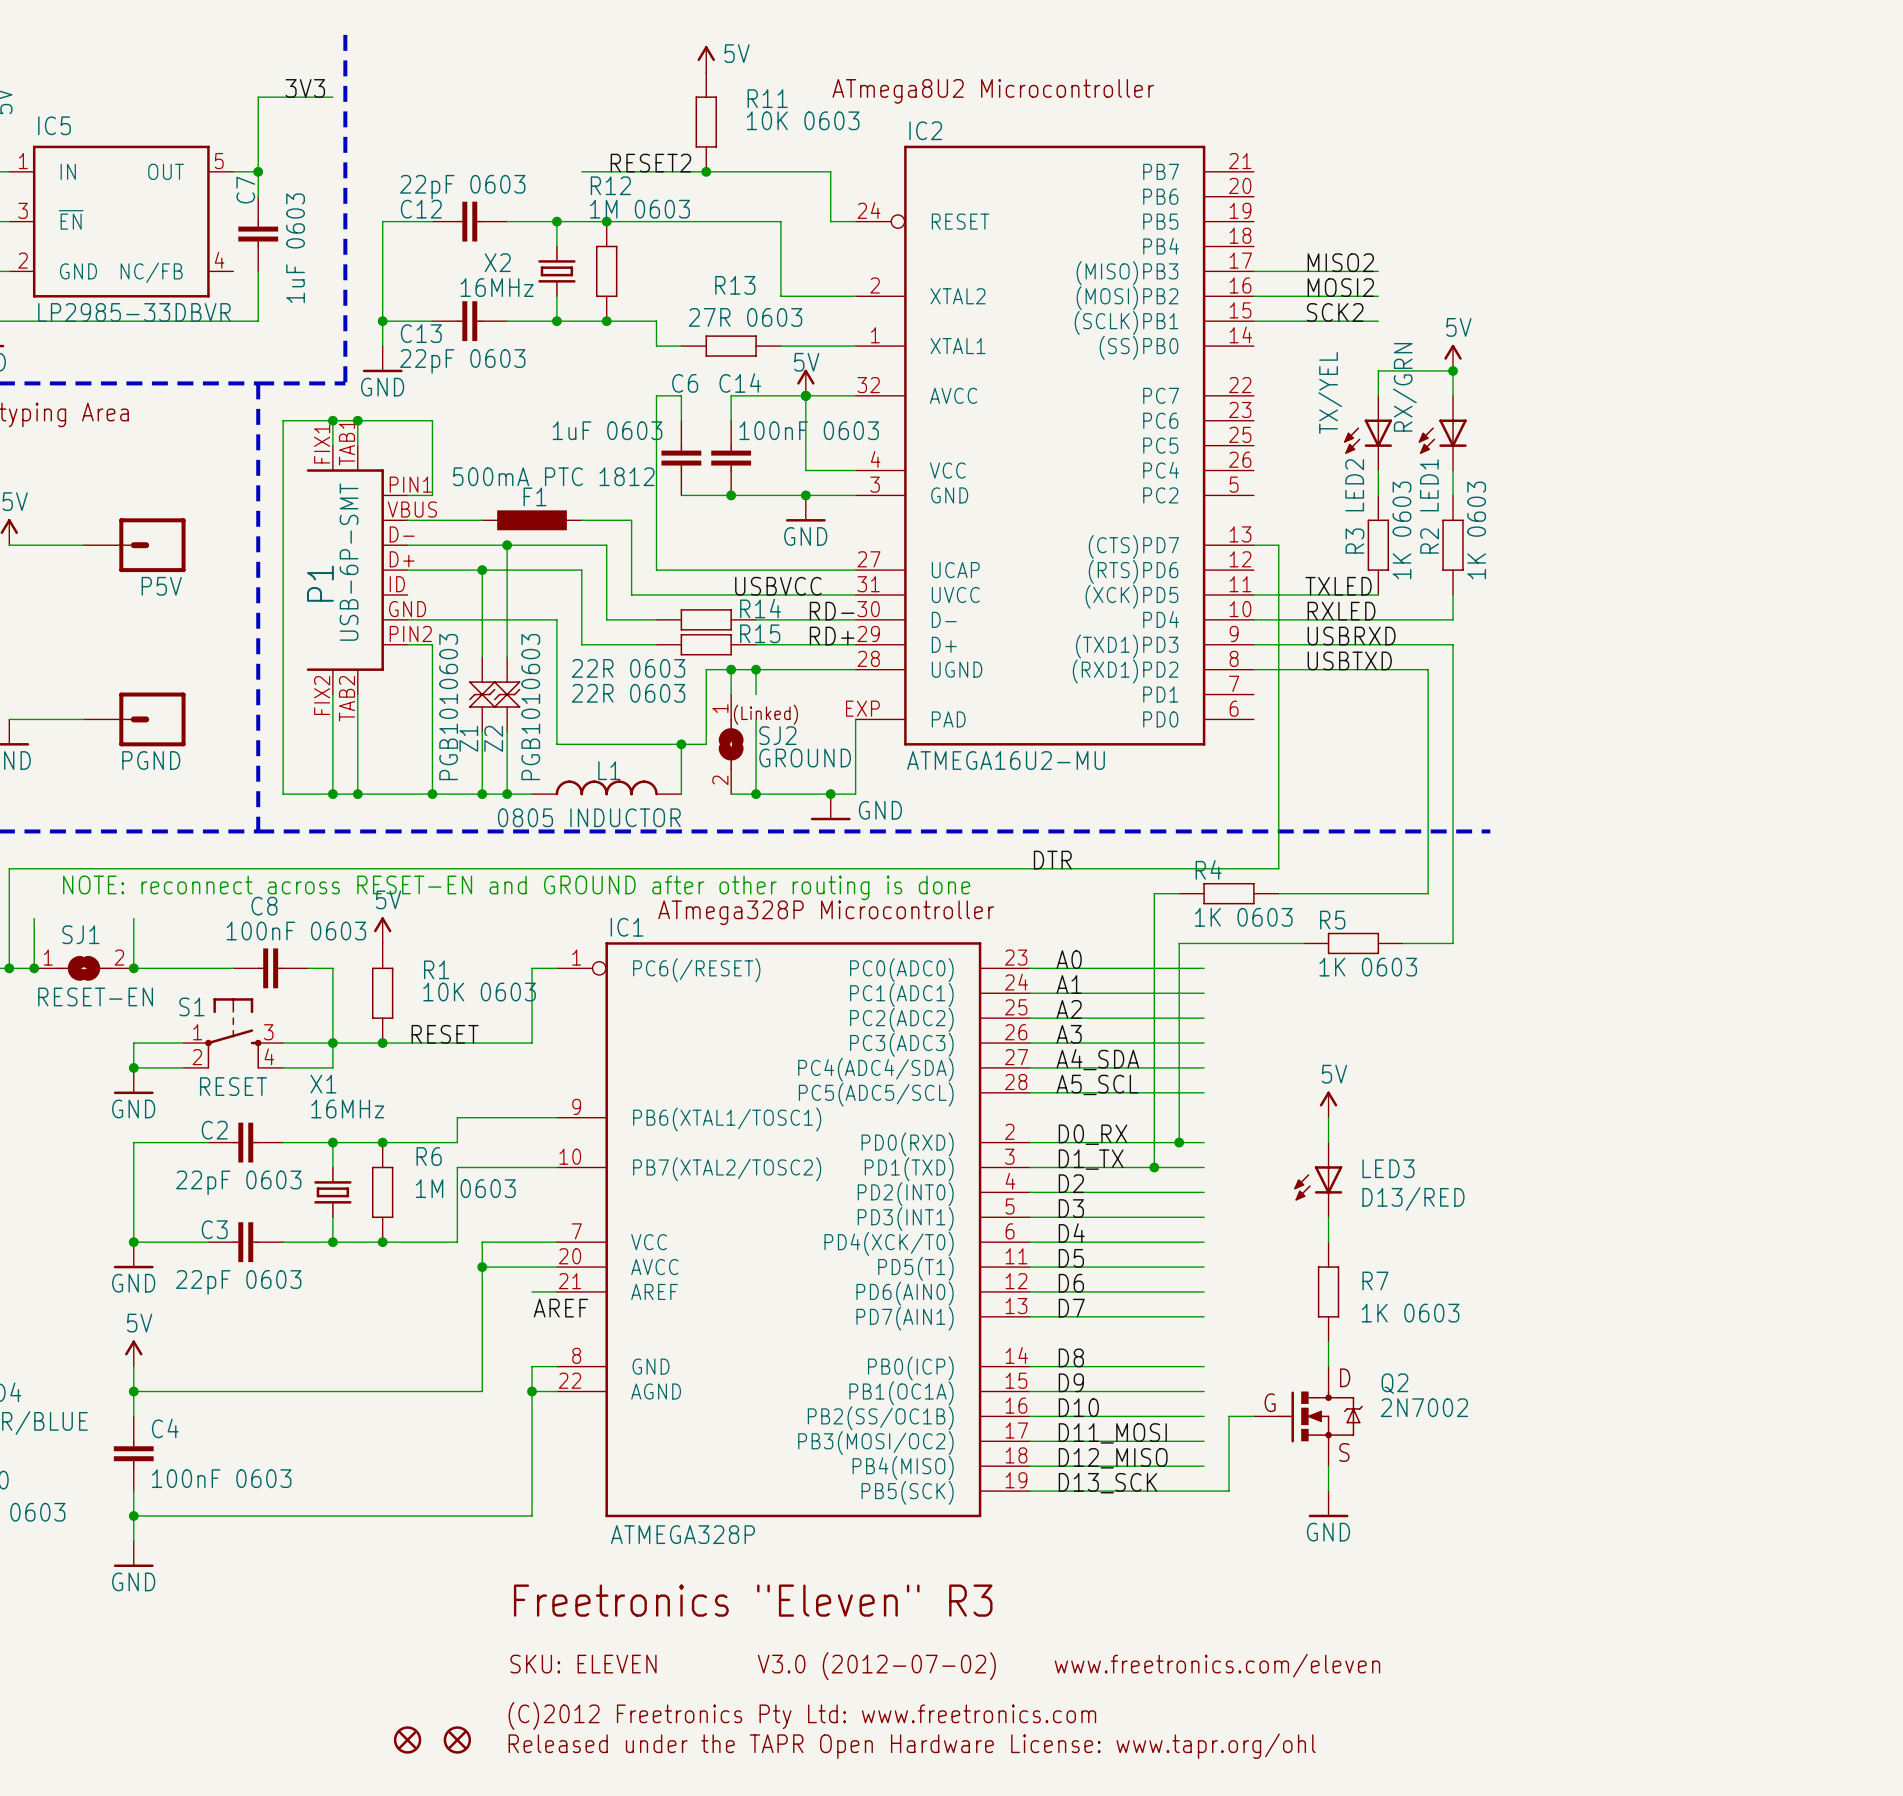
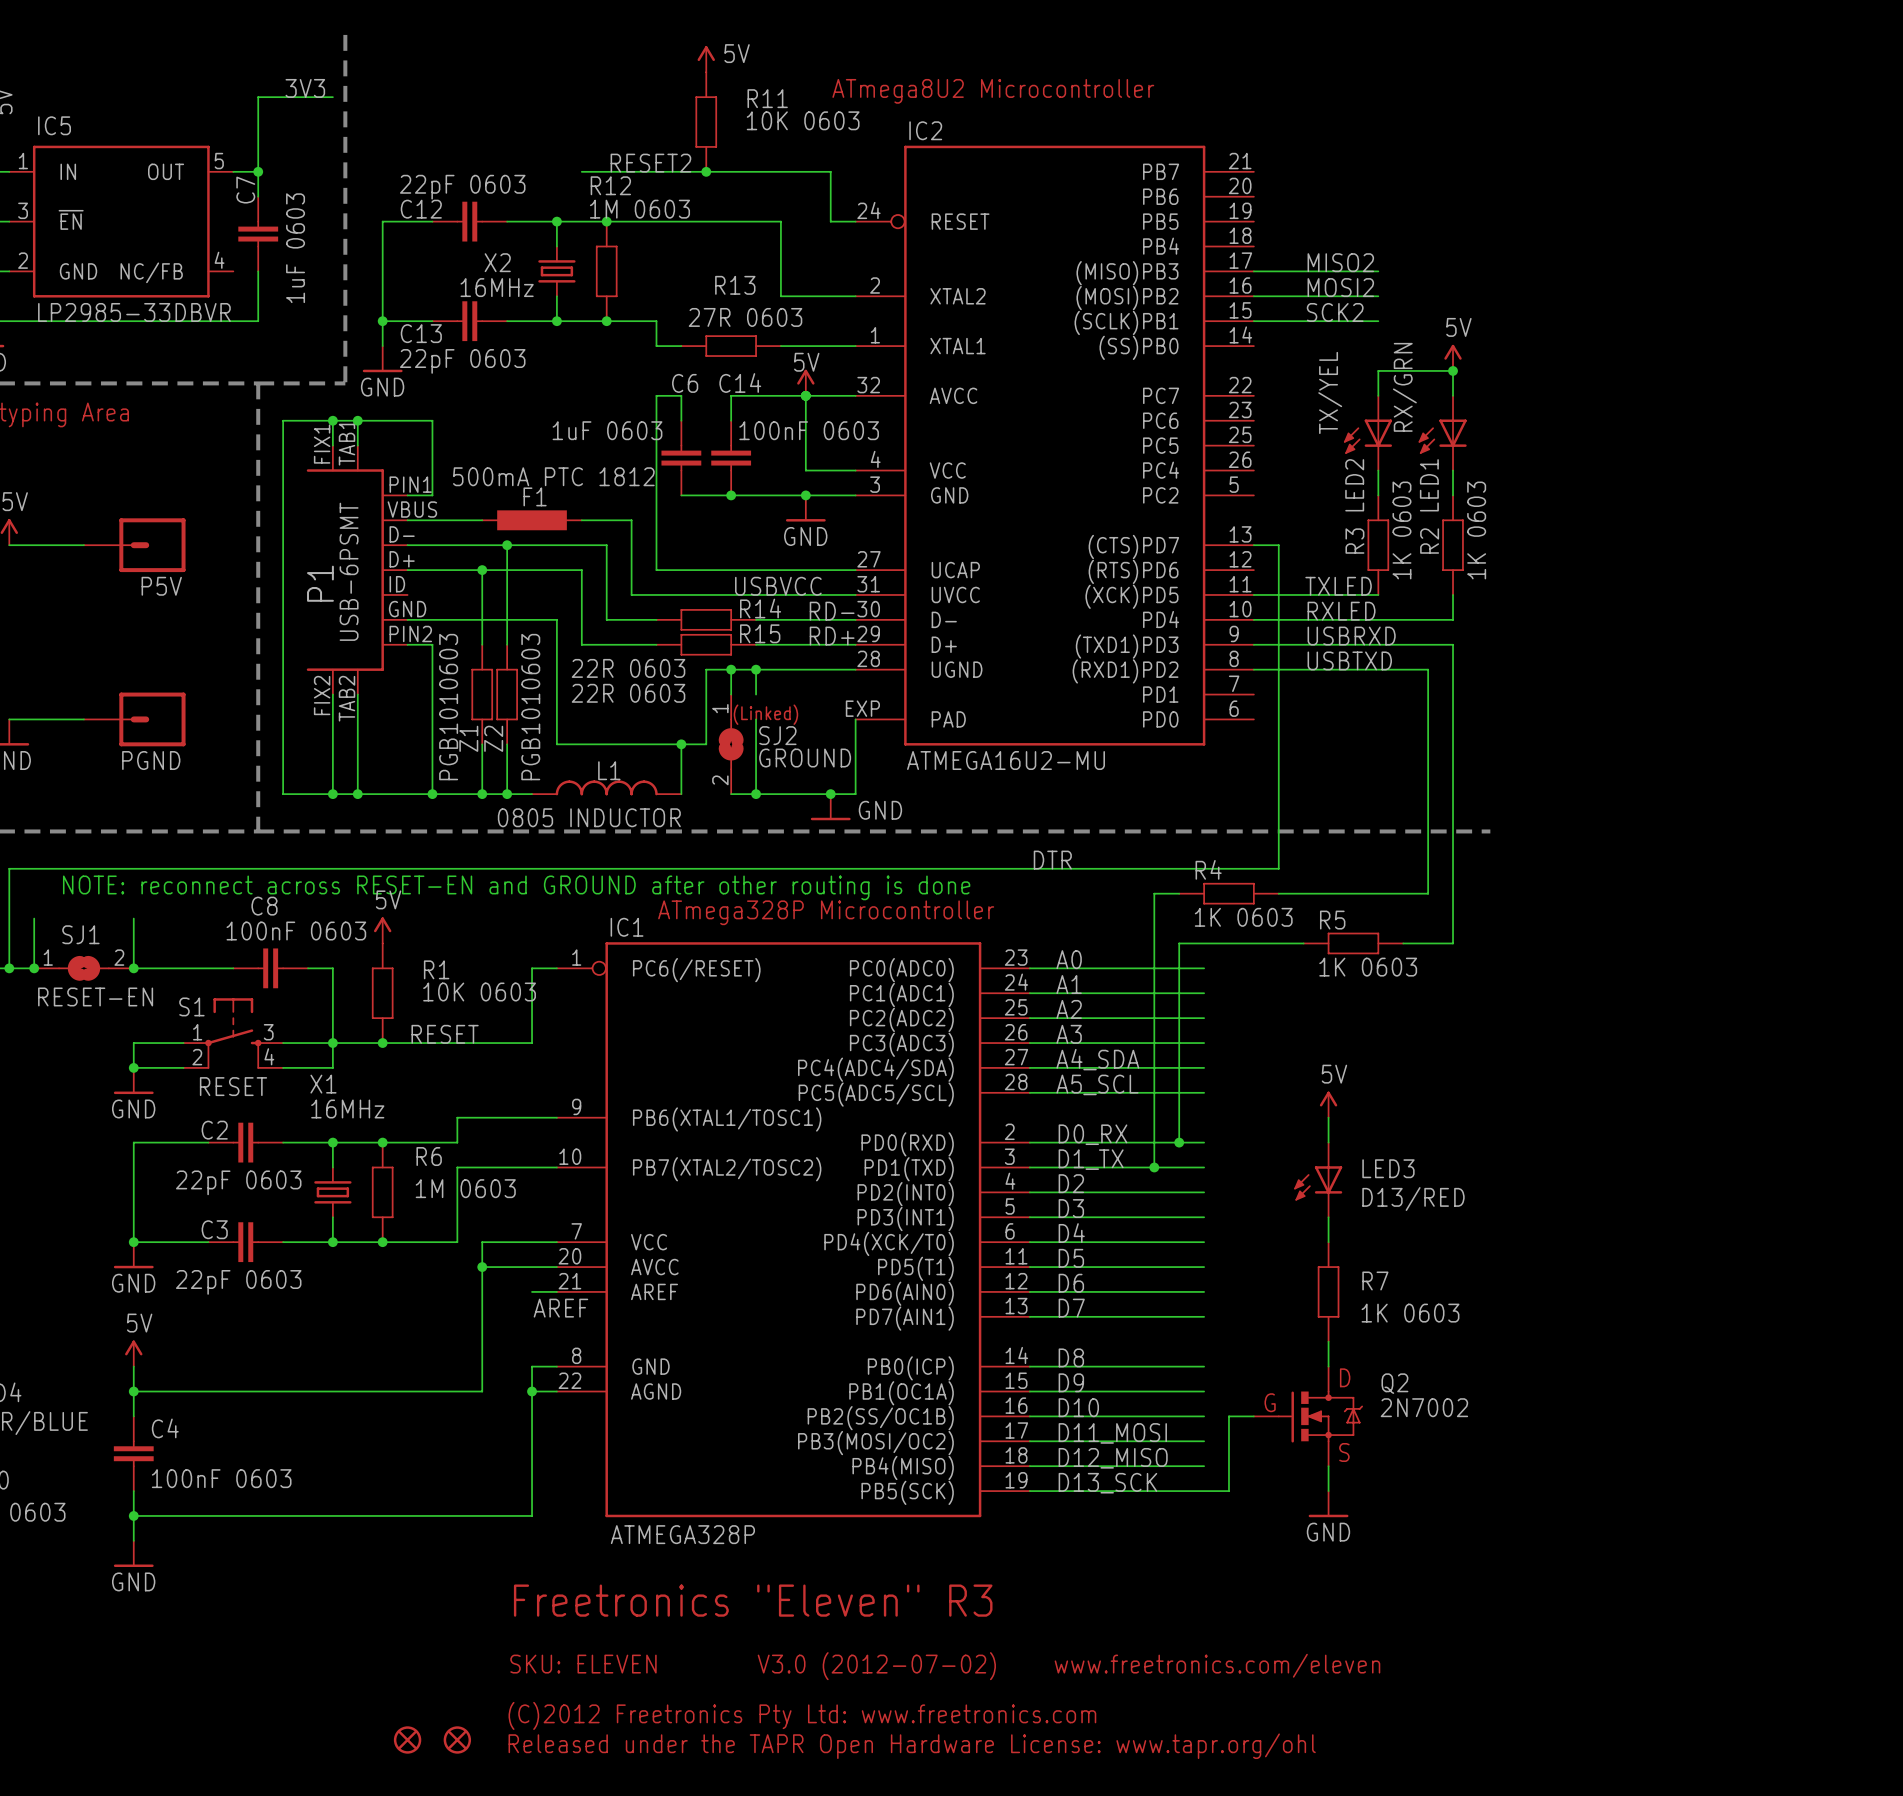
P1 value: USB-6P-SMT (349, 562) -> USB-6PSMT (349, 571)
Z1 symbol: [469, 657, 496, 732] -> [471, 644, 493, 745]
Z2 symbol: [493, 657, 521, 732] -> [496, 644, 518, 745]

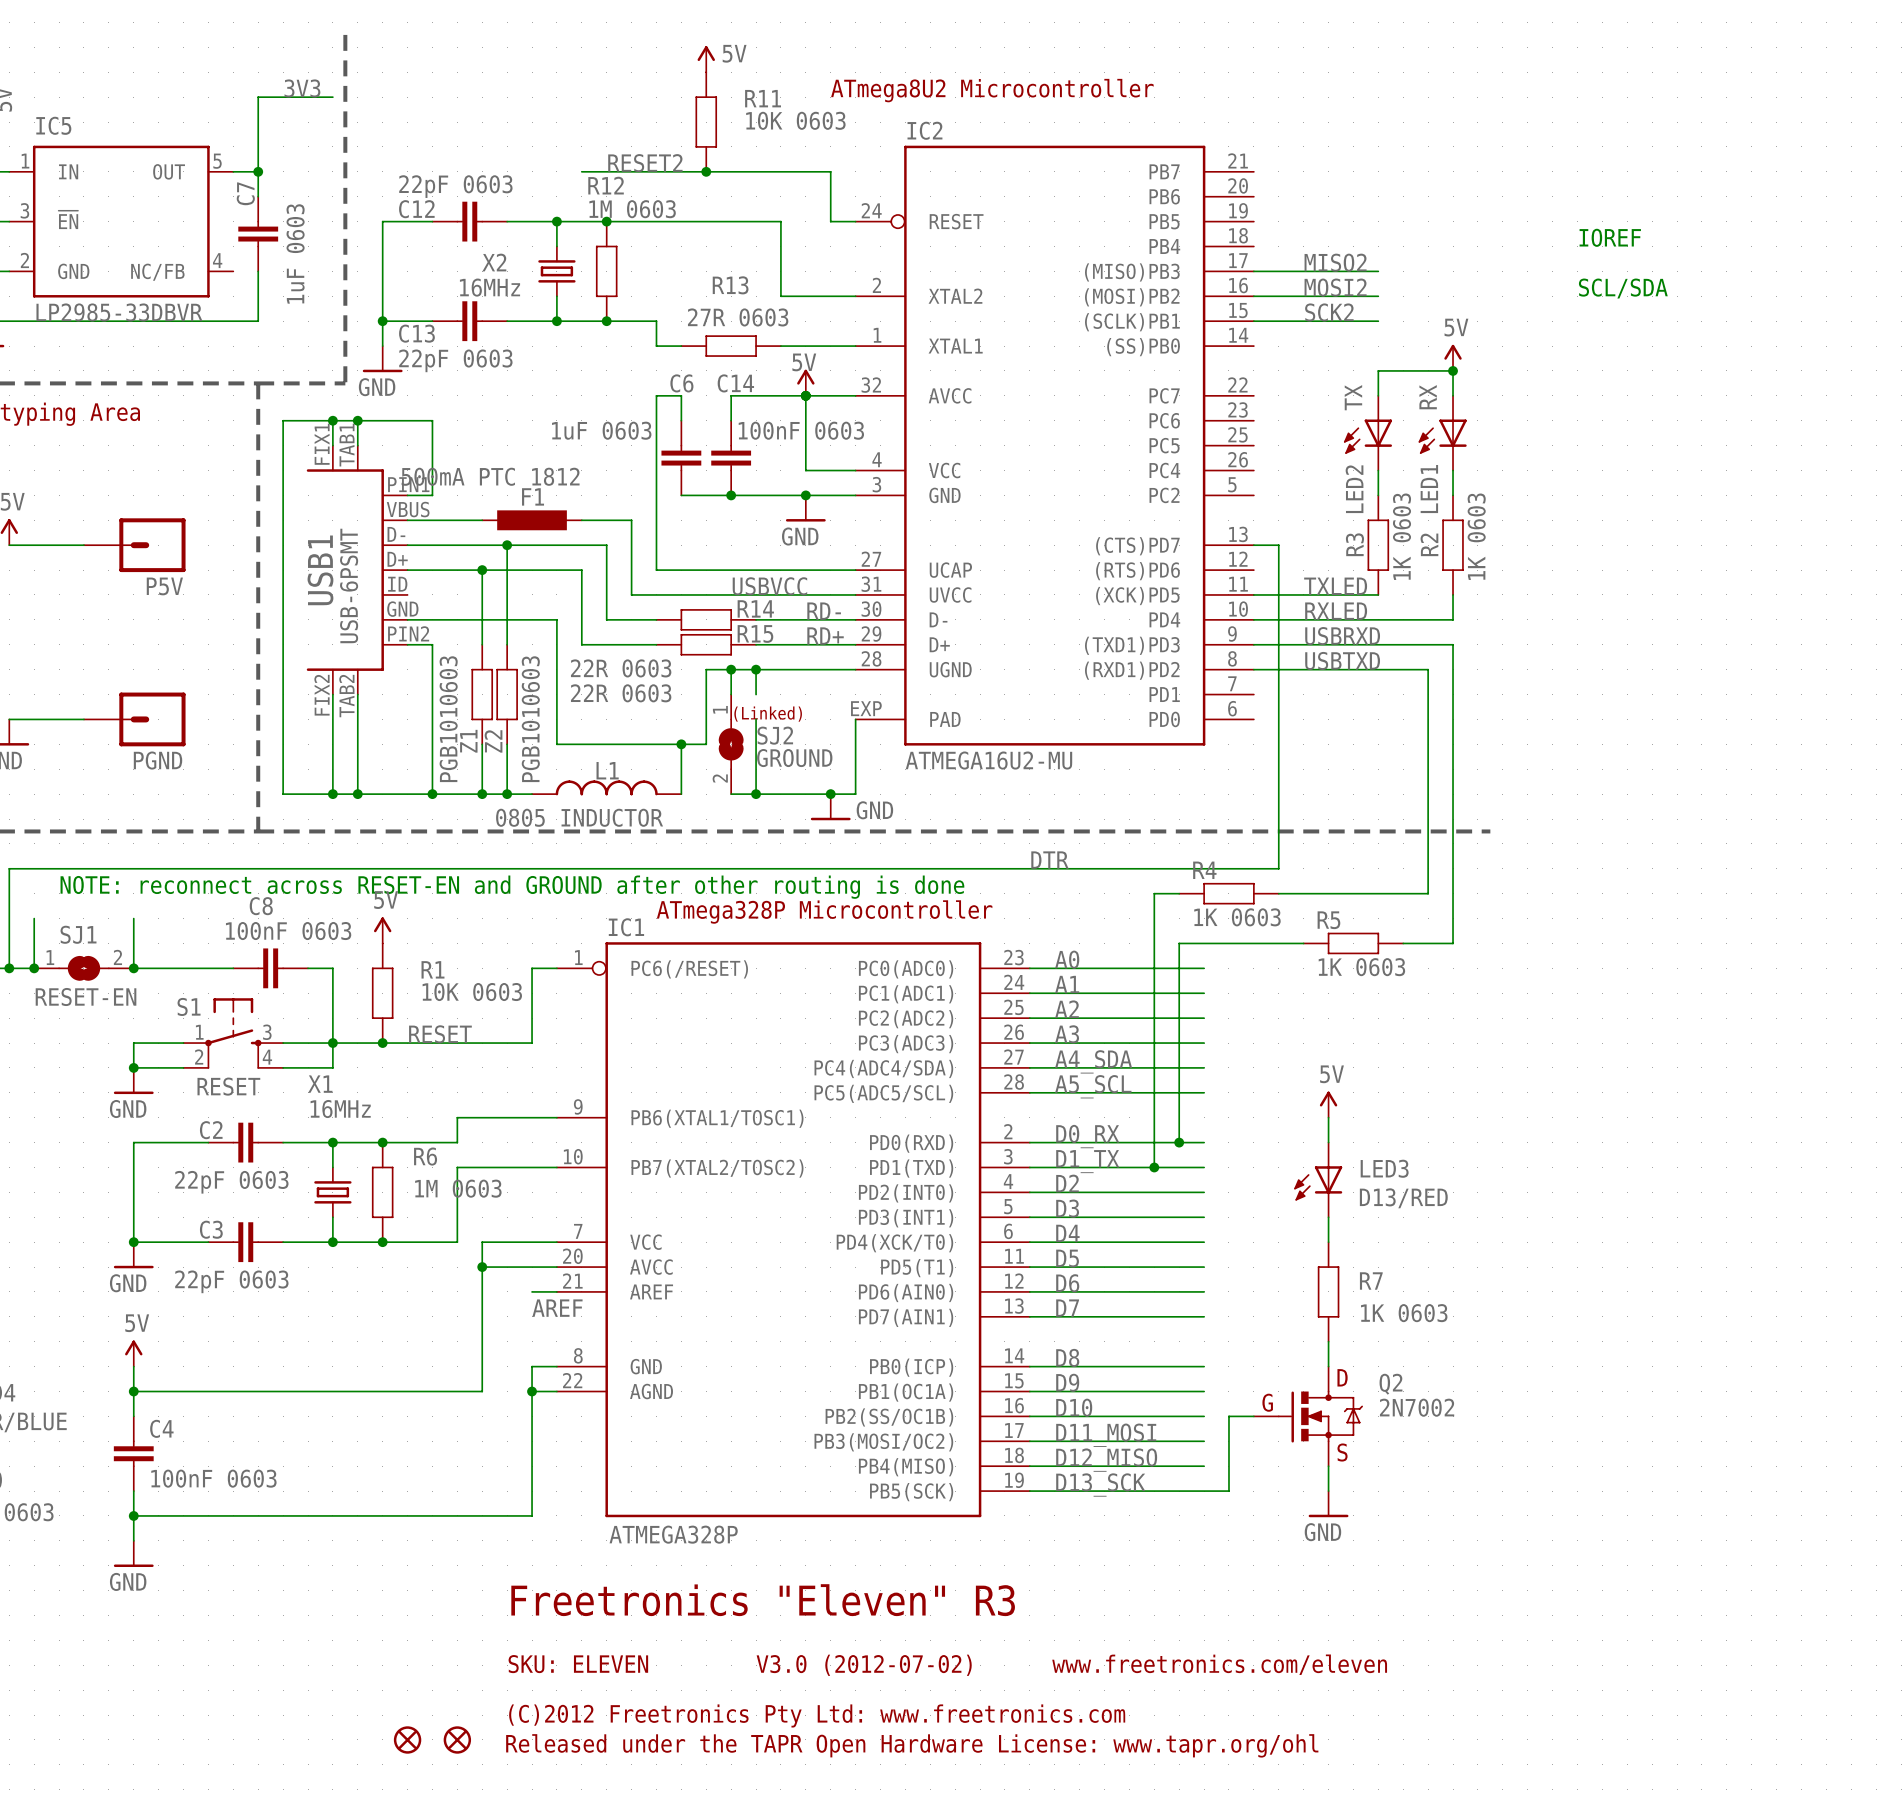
text: none -> IOREF (1610, 237)
text: none -> SCL/SDA (1623, 288)
LED1 value: RX/GRN (1404, 387) -> RX (1428, 397)
LED2 value: TX/YEL (1330, 392) -> TX (1353, 397)
F1 value position: 500mA PTC 1812 (553, 476) -> 500mA PTC 1812 (490, 476)
P1 name: P1 (320, 583) -> USB1 (320, 570)

